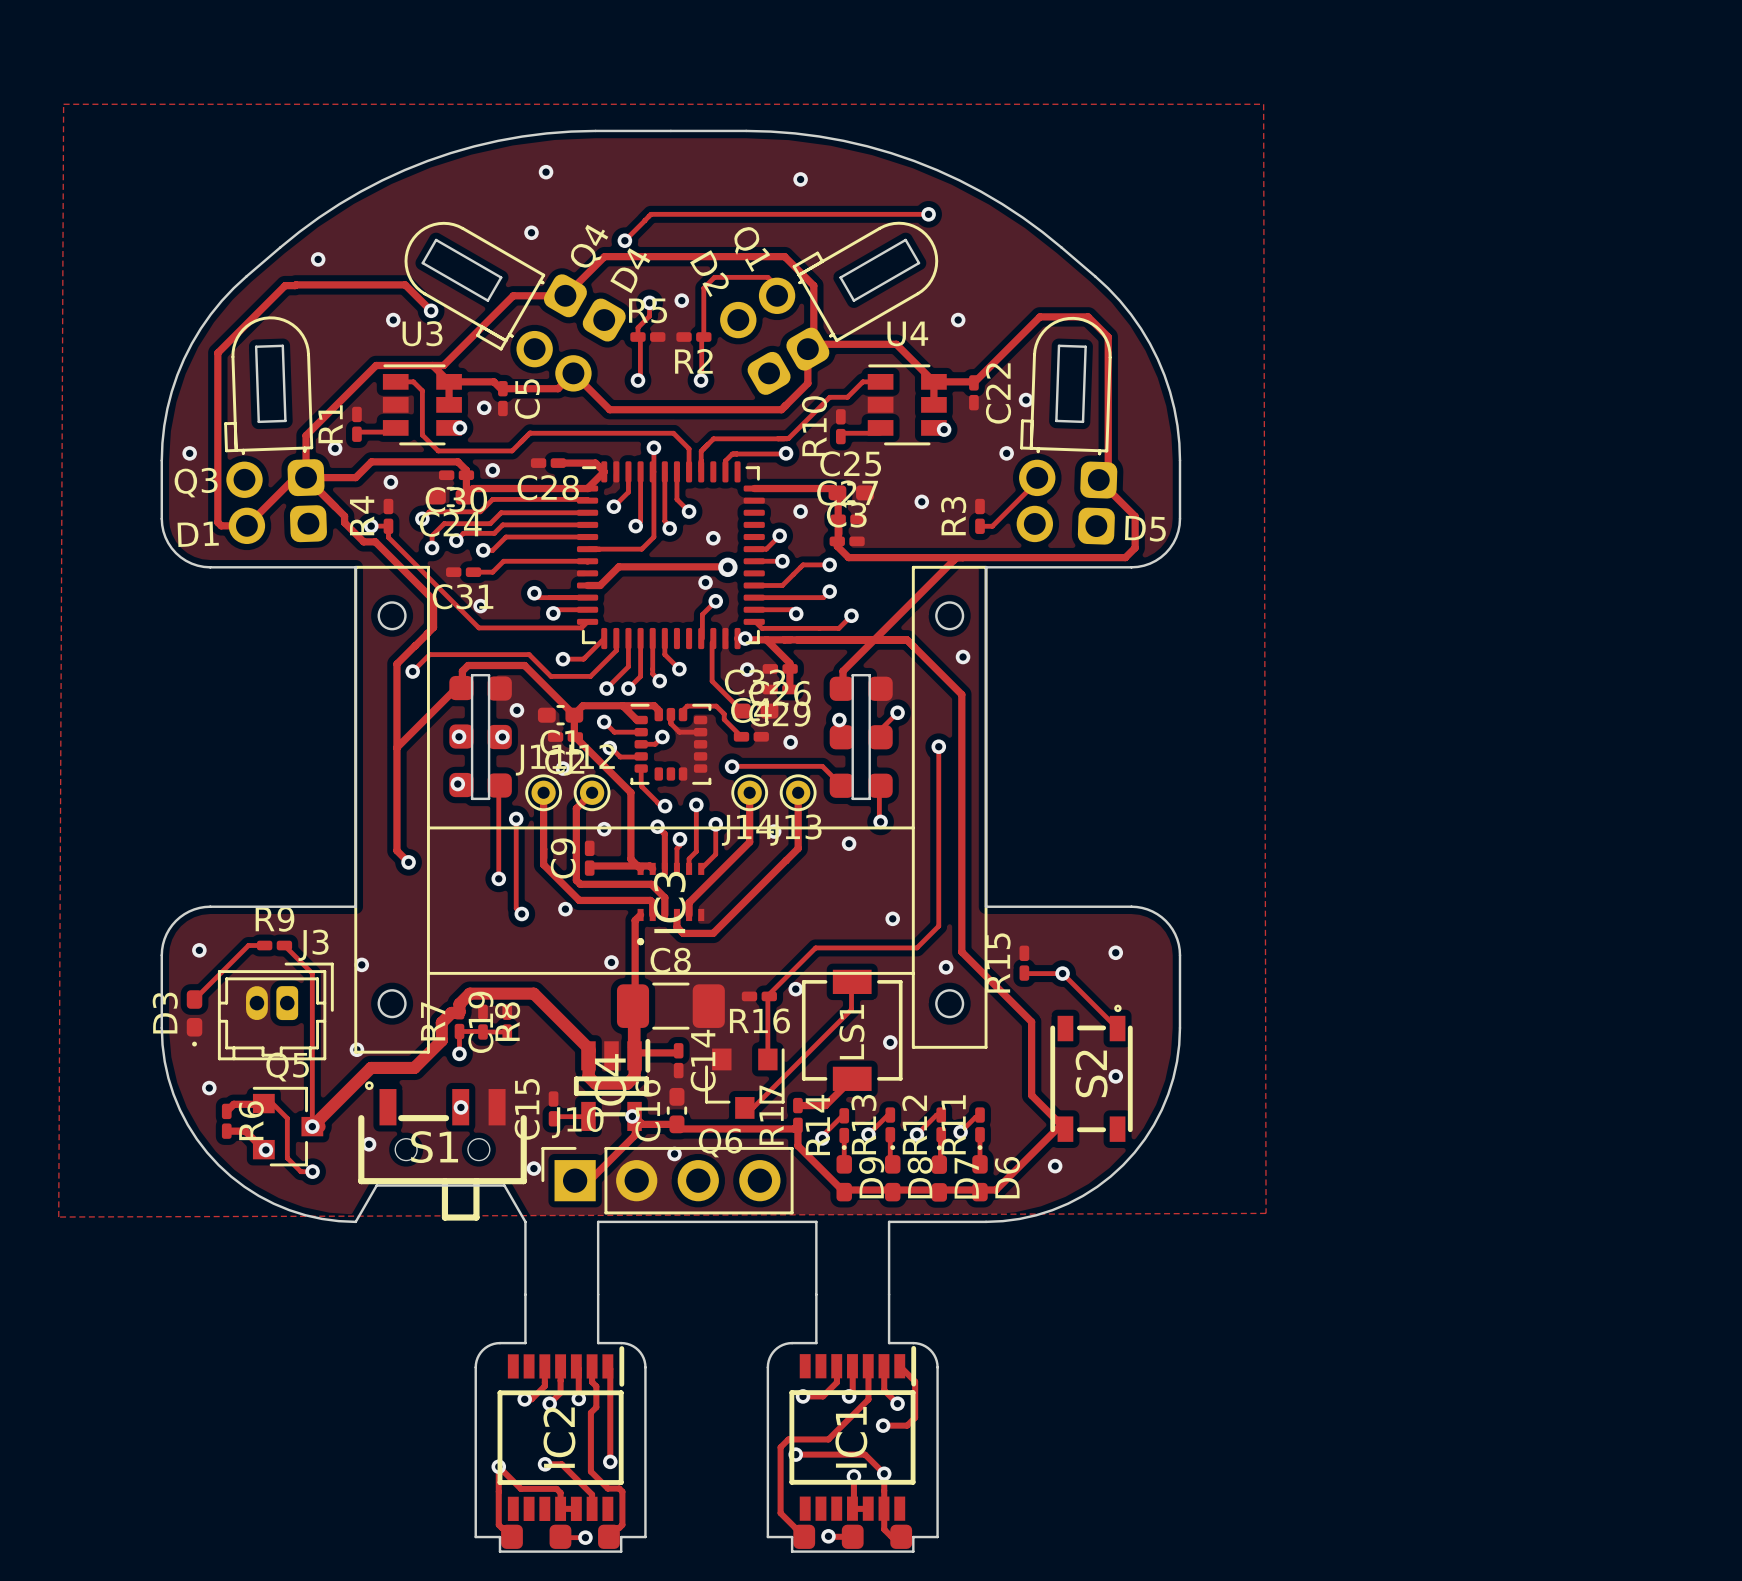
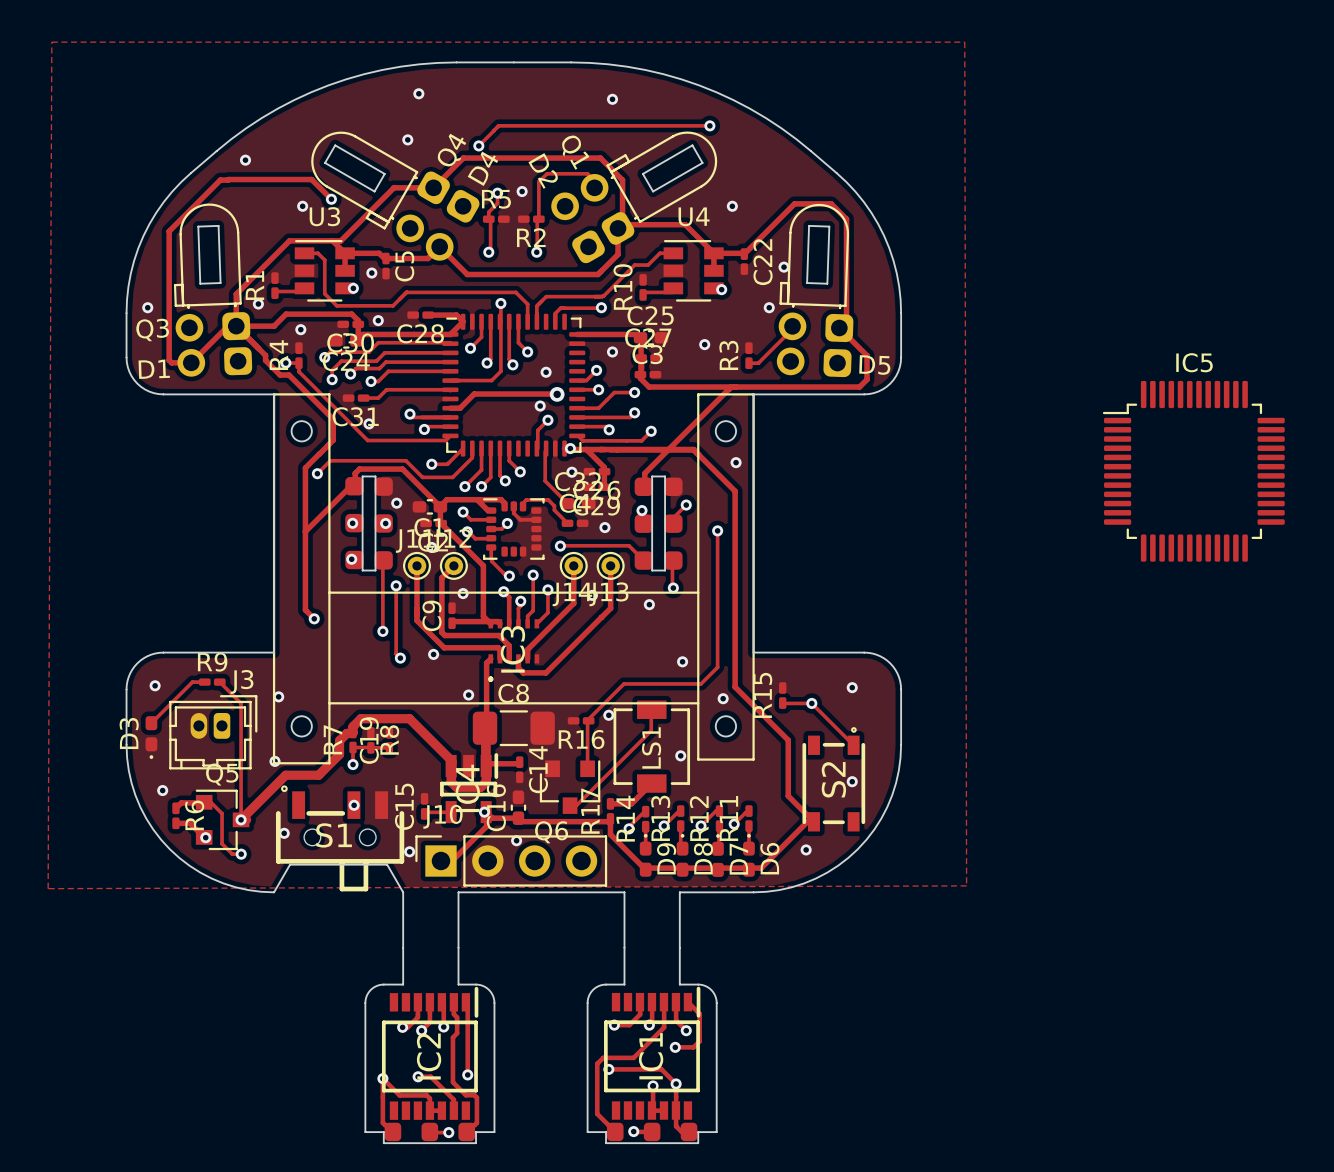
IC5: none -> (1193, 471)

